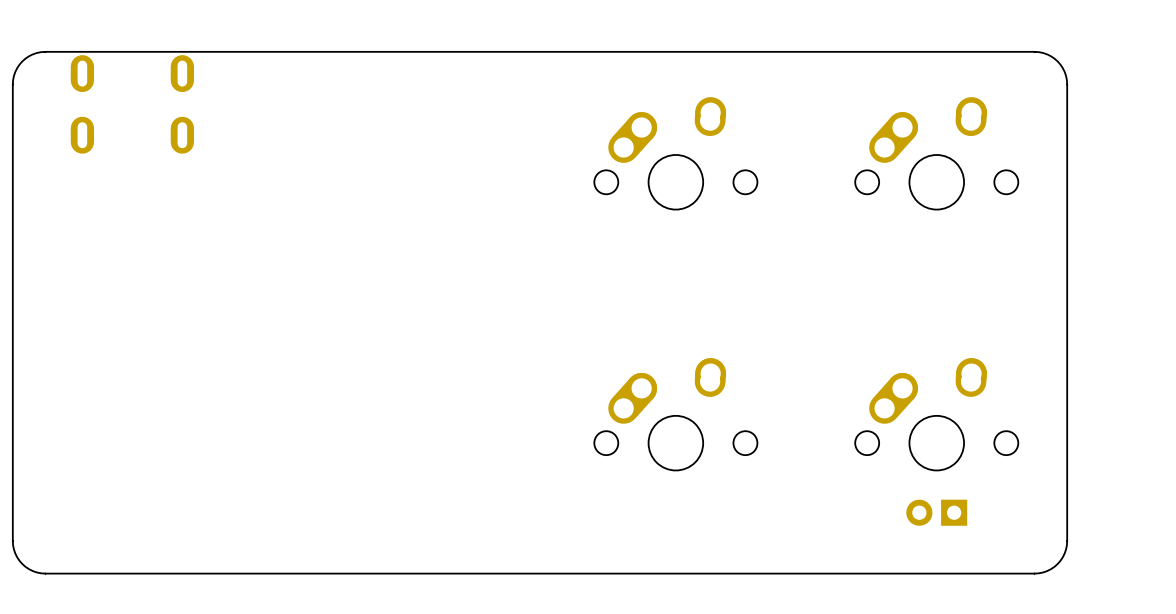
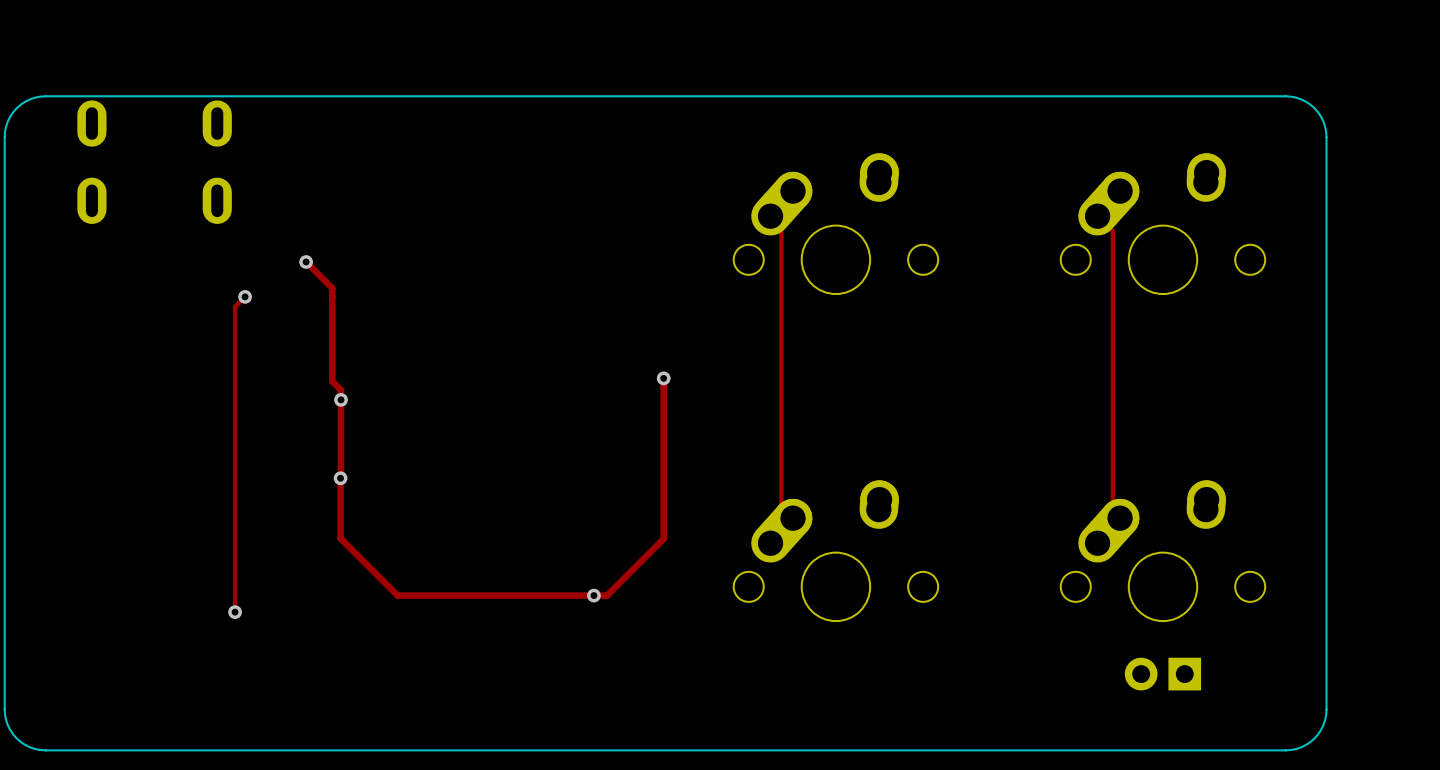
track: none -> (770, 216) (781, 227) (781, 506) (793, 518)
track: none -> (1097, 216) (1112, 231) (1112, 510) (1120, 518)
track: none -> (306, 261) (332, 288) (332, 381) (341, 390) (340, 538) (397, 595) (607, 595) (663, 538) (663, 378)
via: none -> (306, 261)
track: none -> (245, 296) (235, 306) (235, 612)
via: none -> (245, 296)
via: none -> (663, 378)
via: none -> (341, 399)
via: none -> (340, 478)
via: none -> (593, 595)
via: none -> (235, 612)

